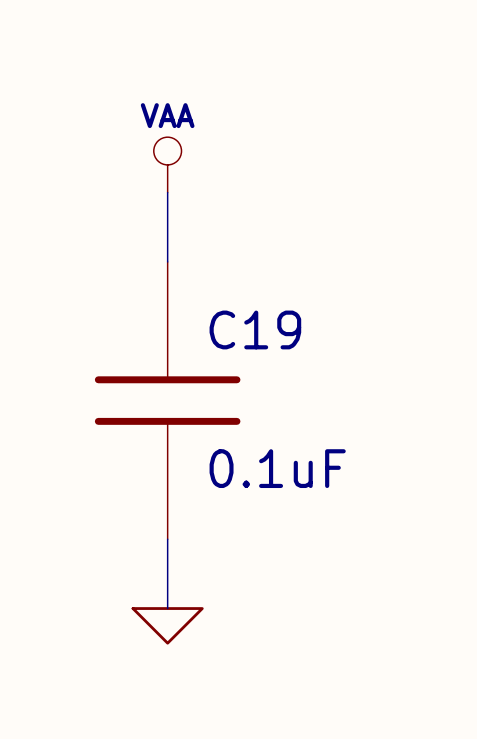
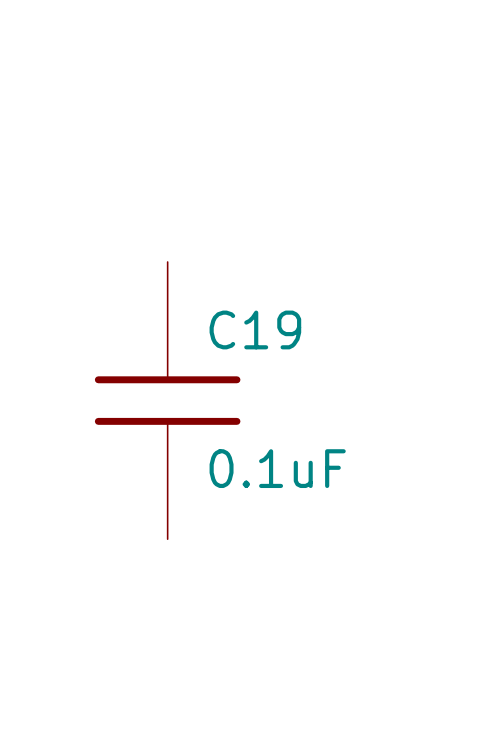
power symbol: VAA (167, 164) -> none
wire: (167, 192) (167, 261) -> none
wire: (167, 539) (167, 608) -> none
power symbol: (167, 625) -> none

